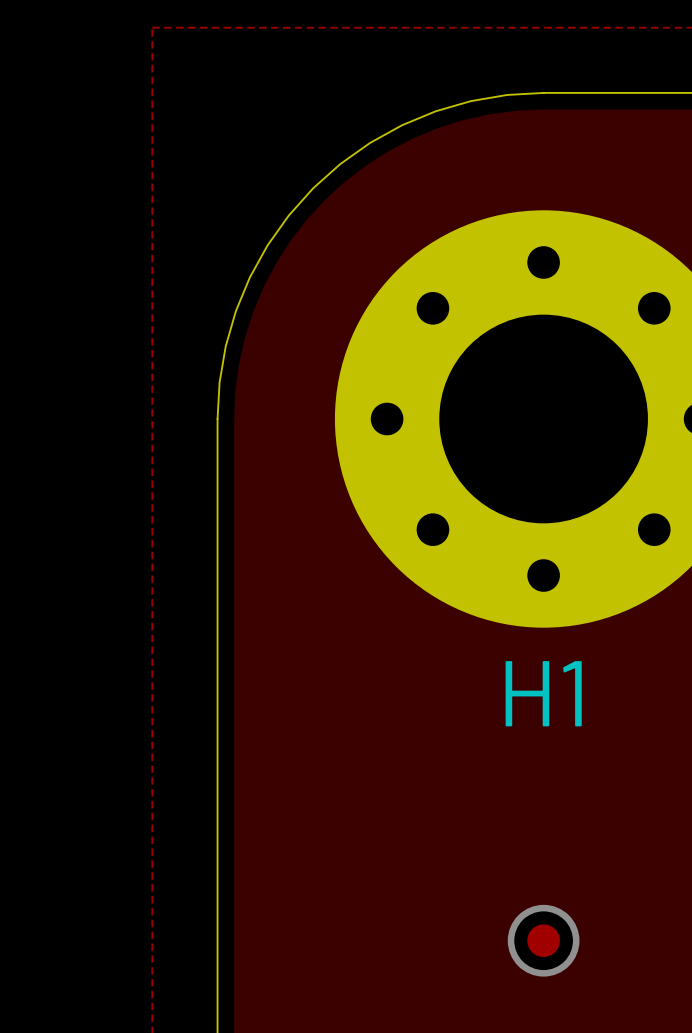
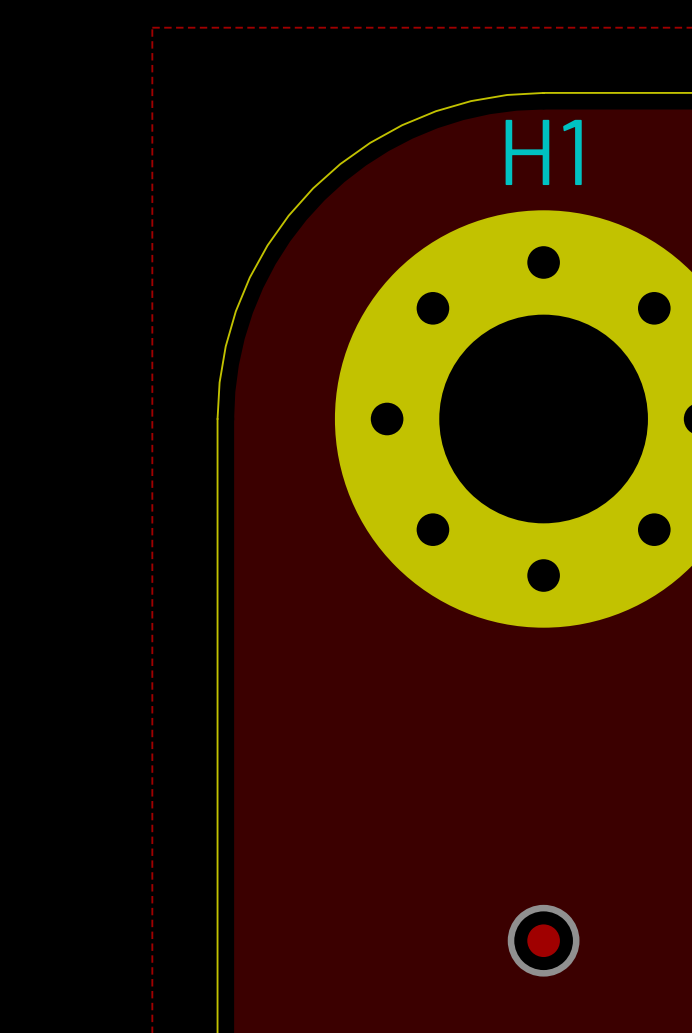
H1 name position: H1 (543, 693) -> H1 (543, 152)

